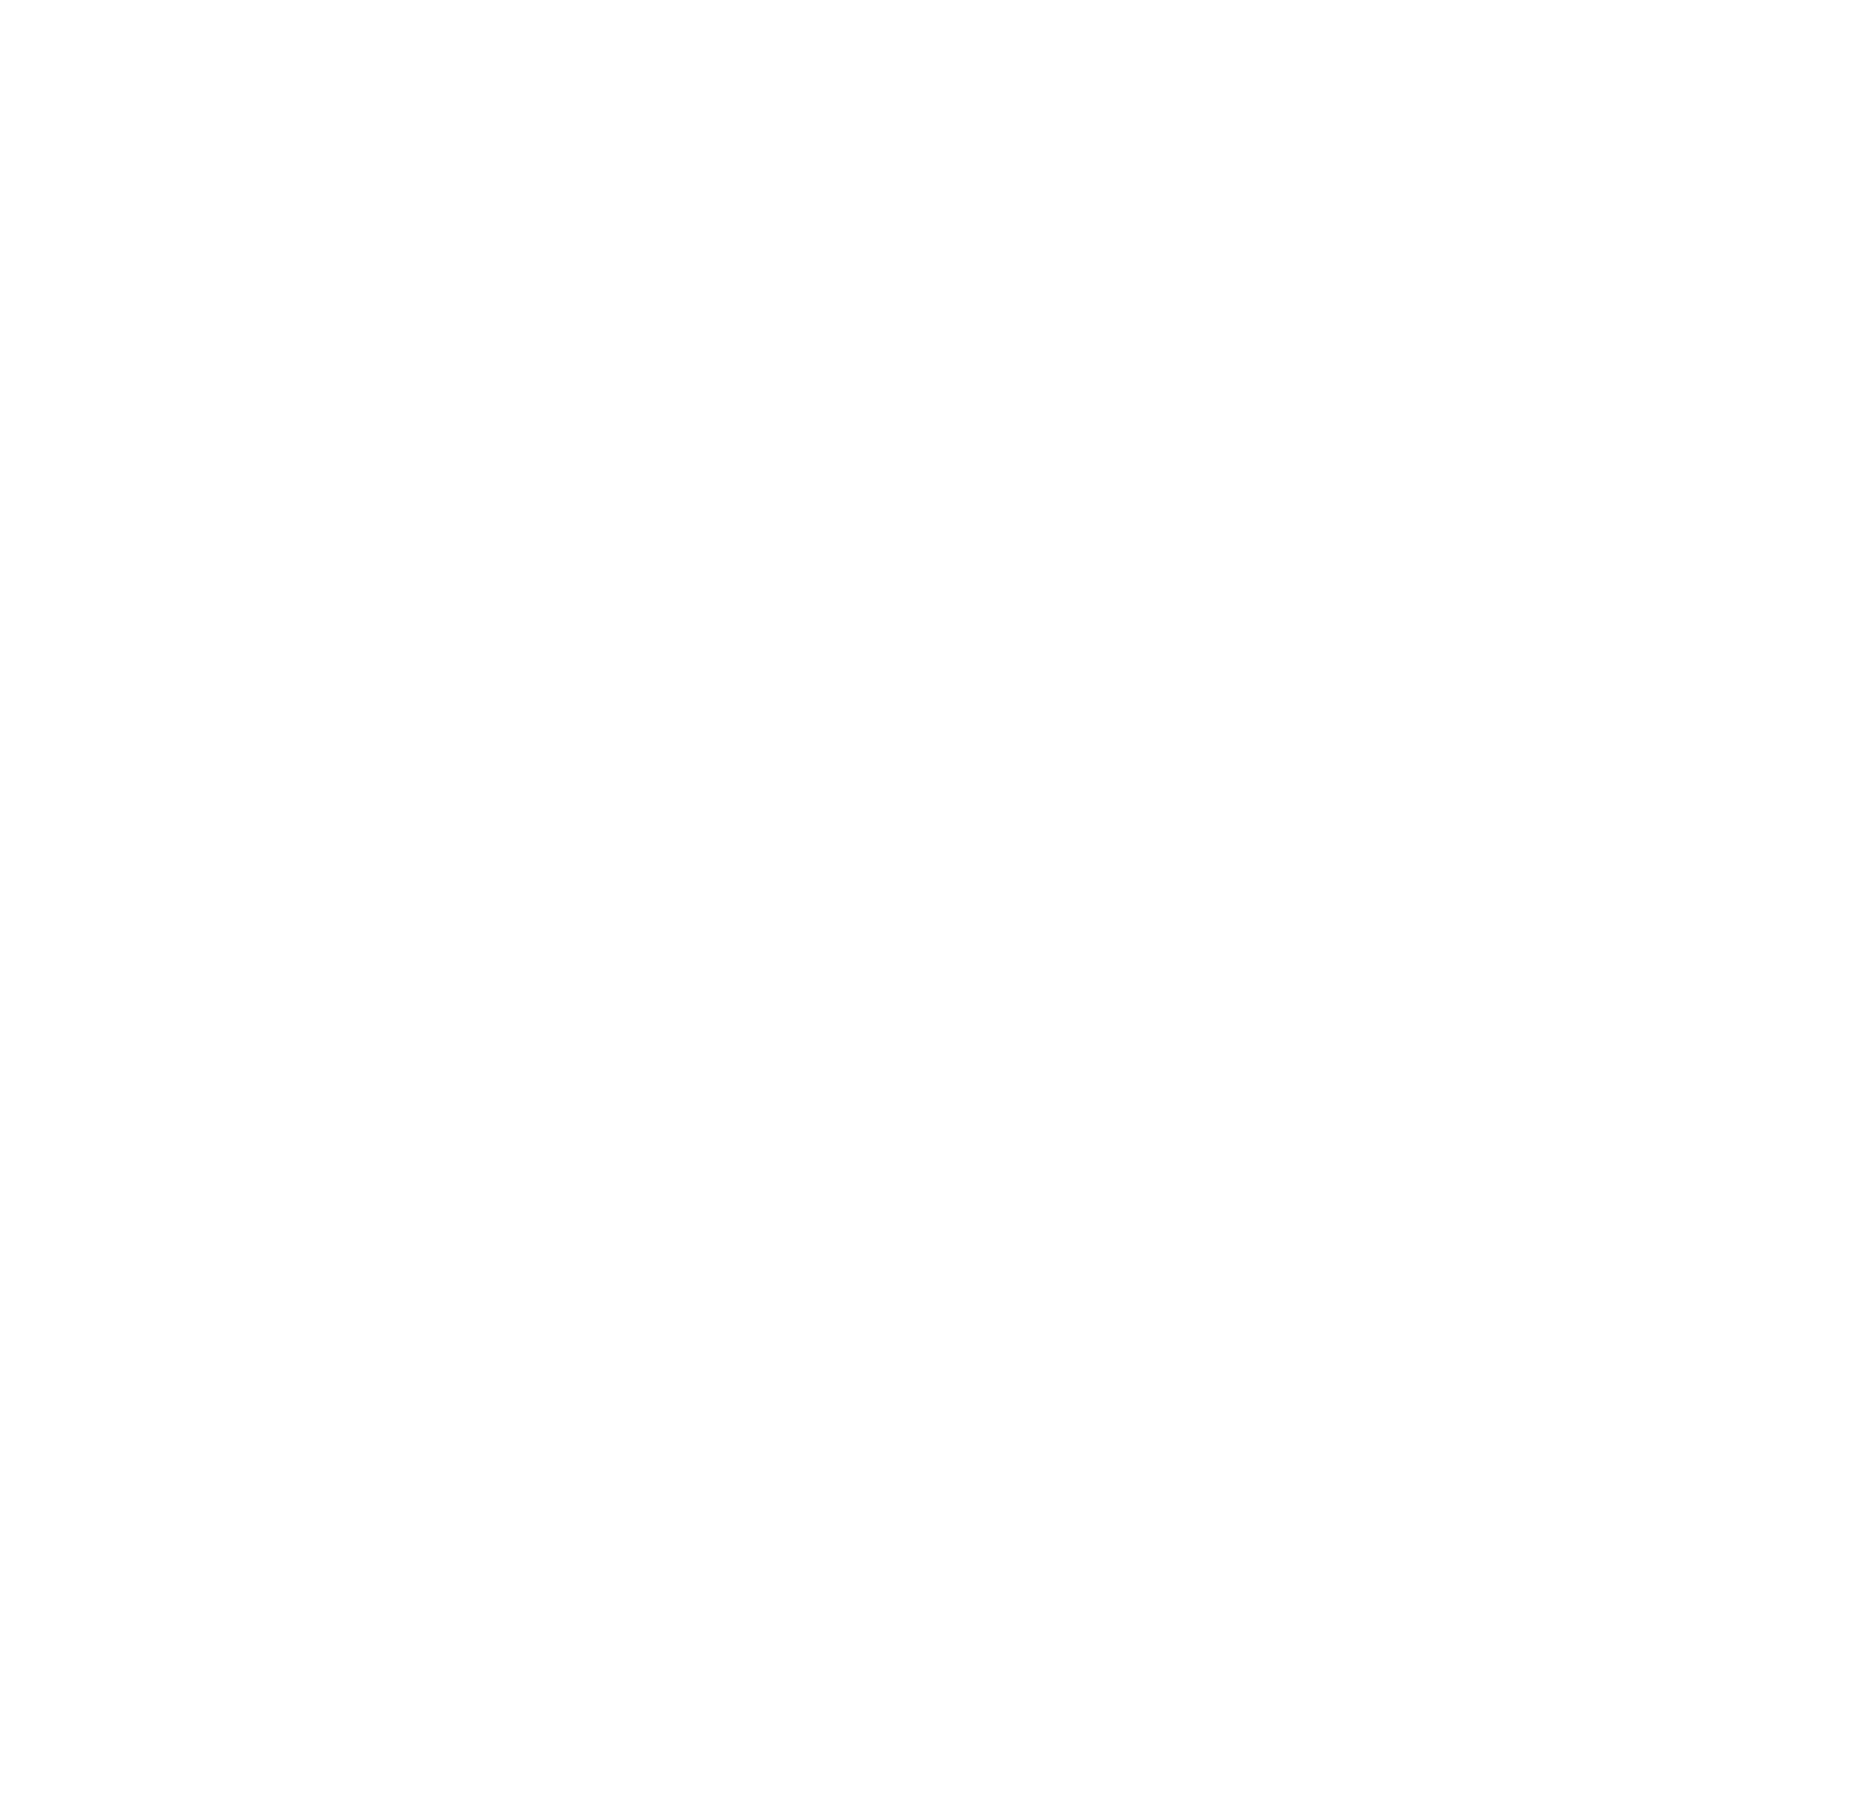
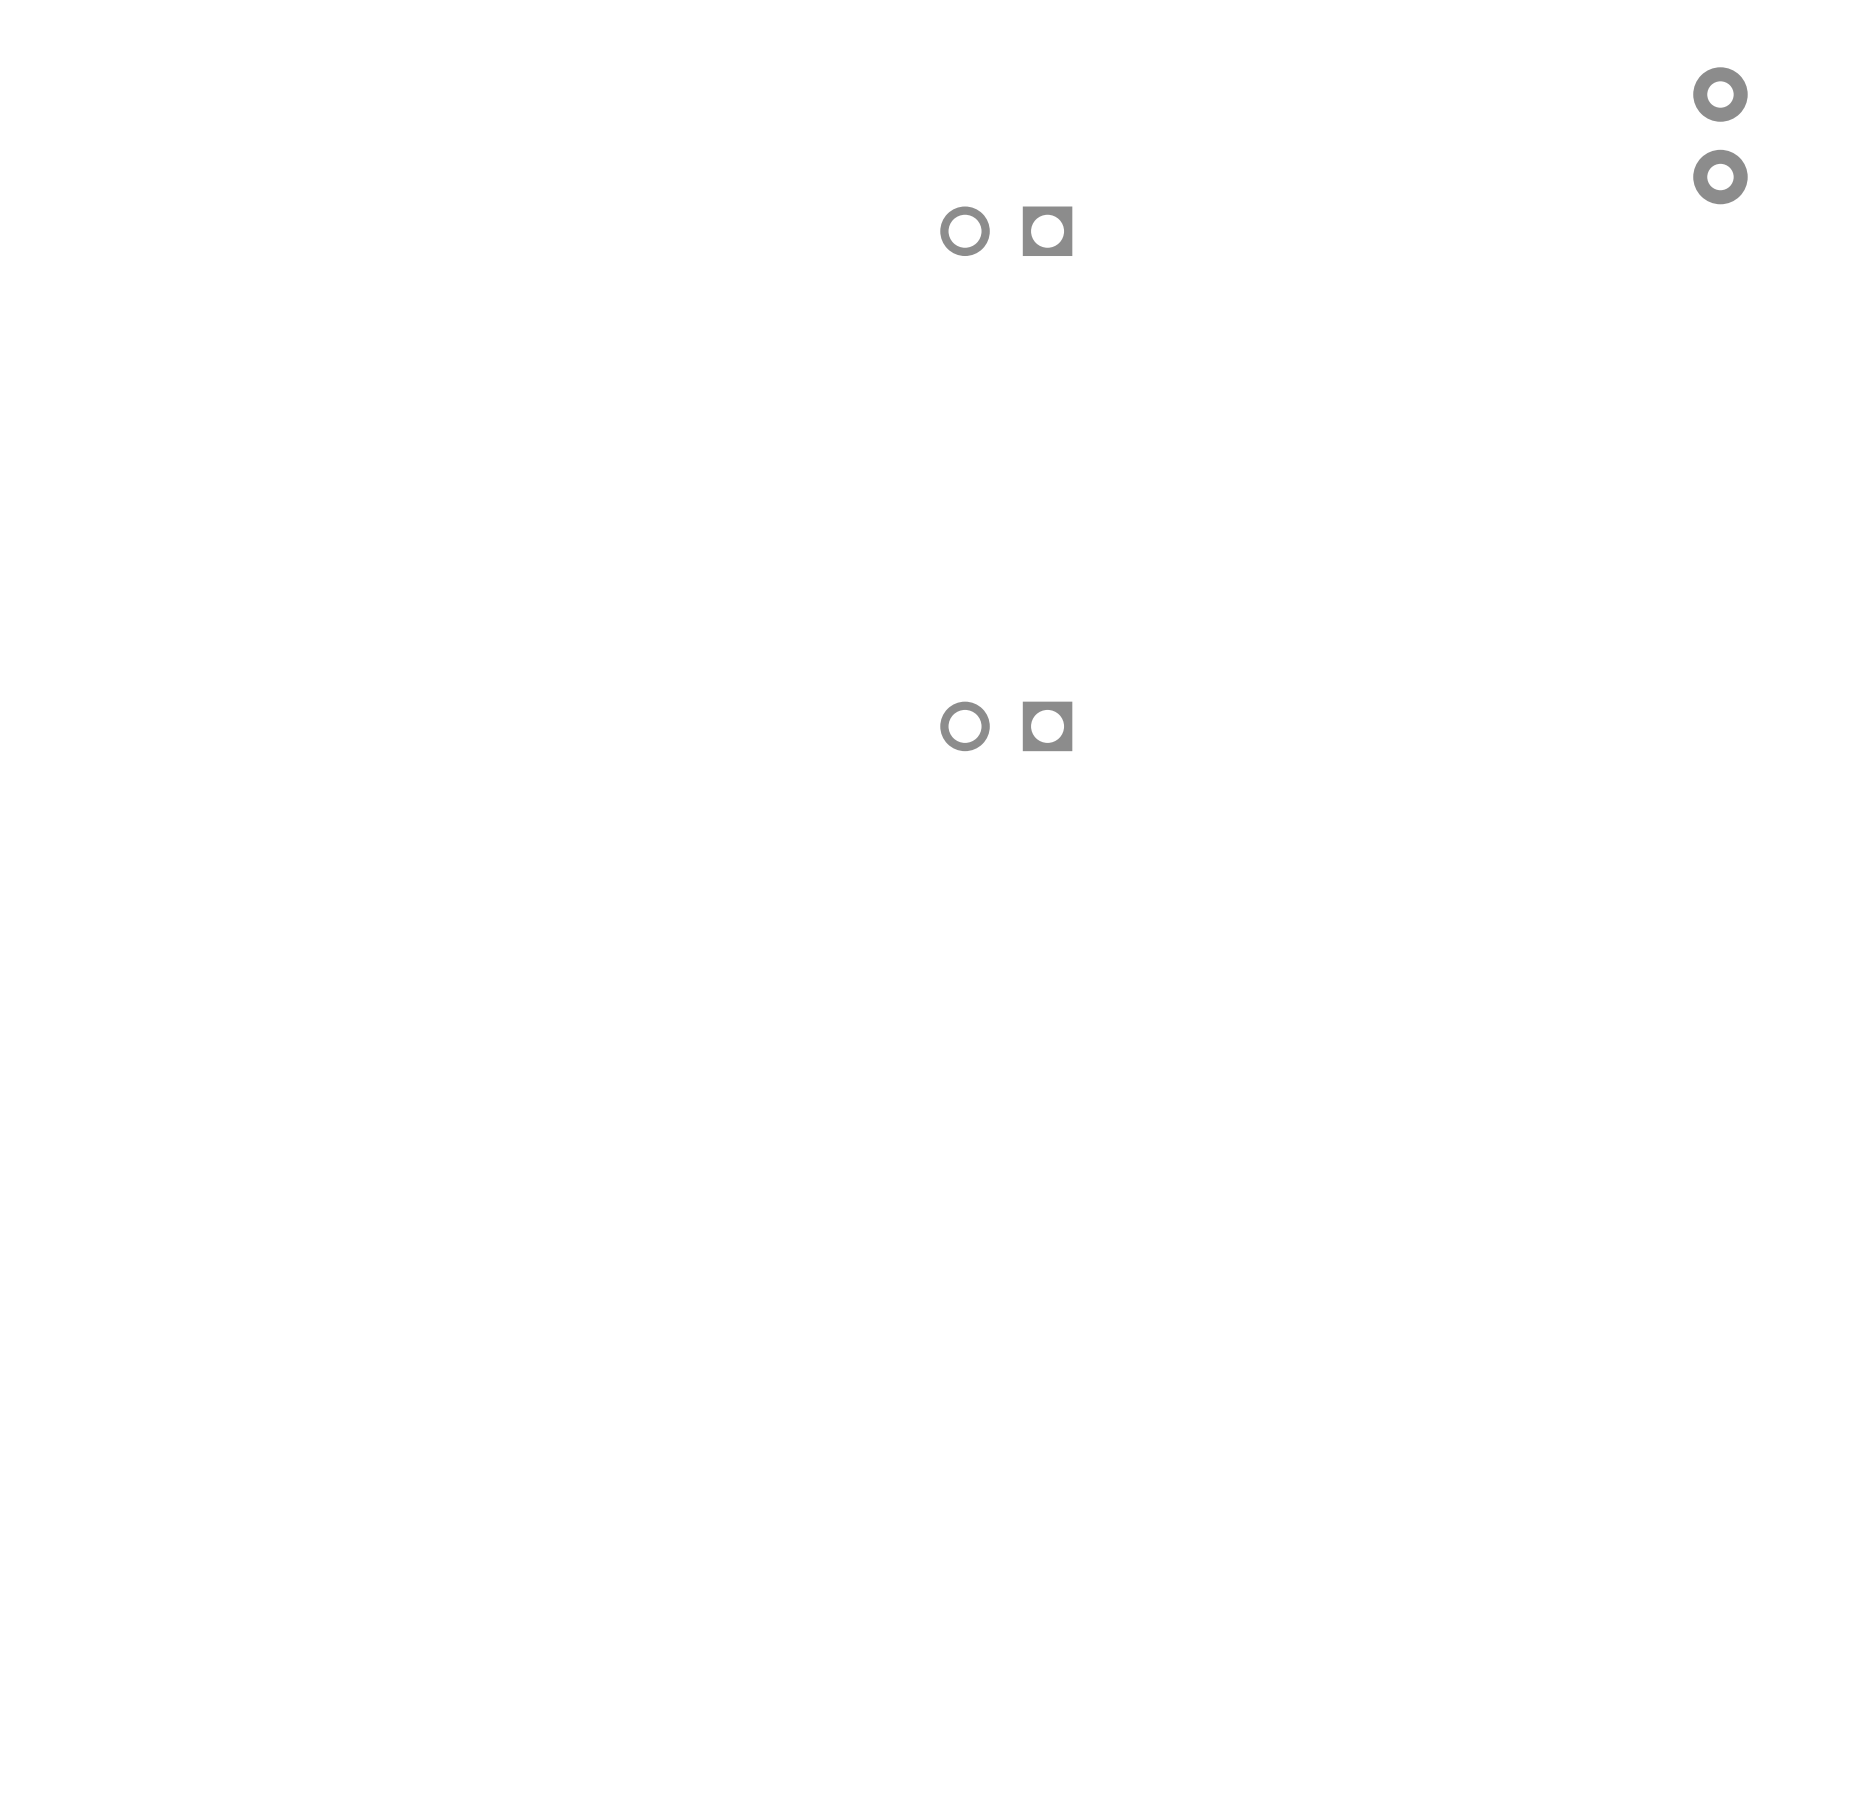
part: none -> (1720, 135)
part: none -> (1006, 231)
part: none -> (1006, 726)

